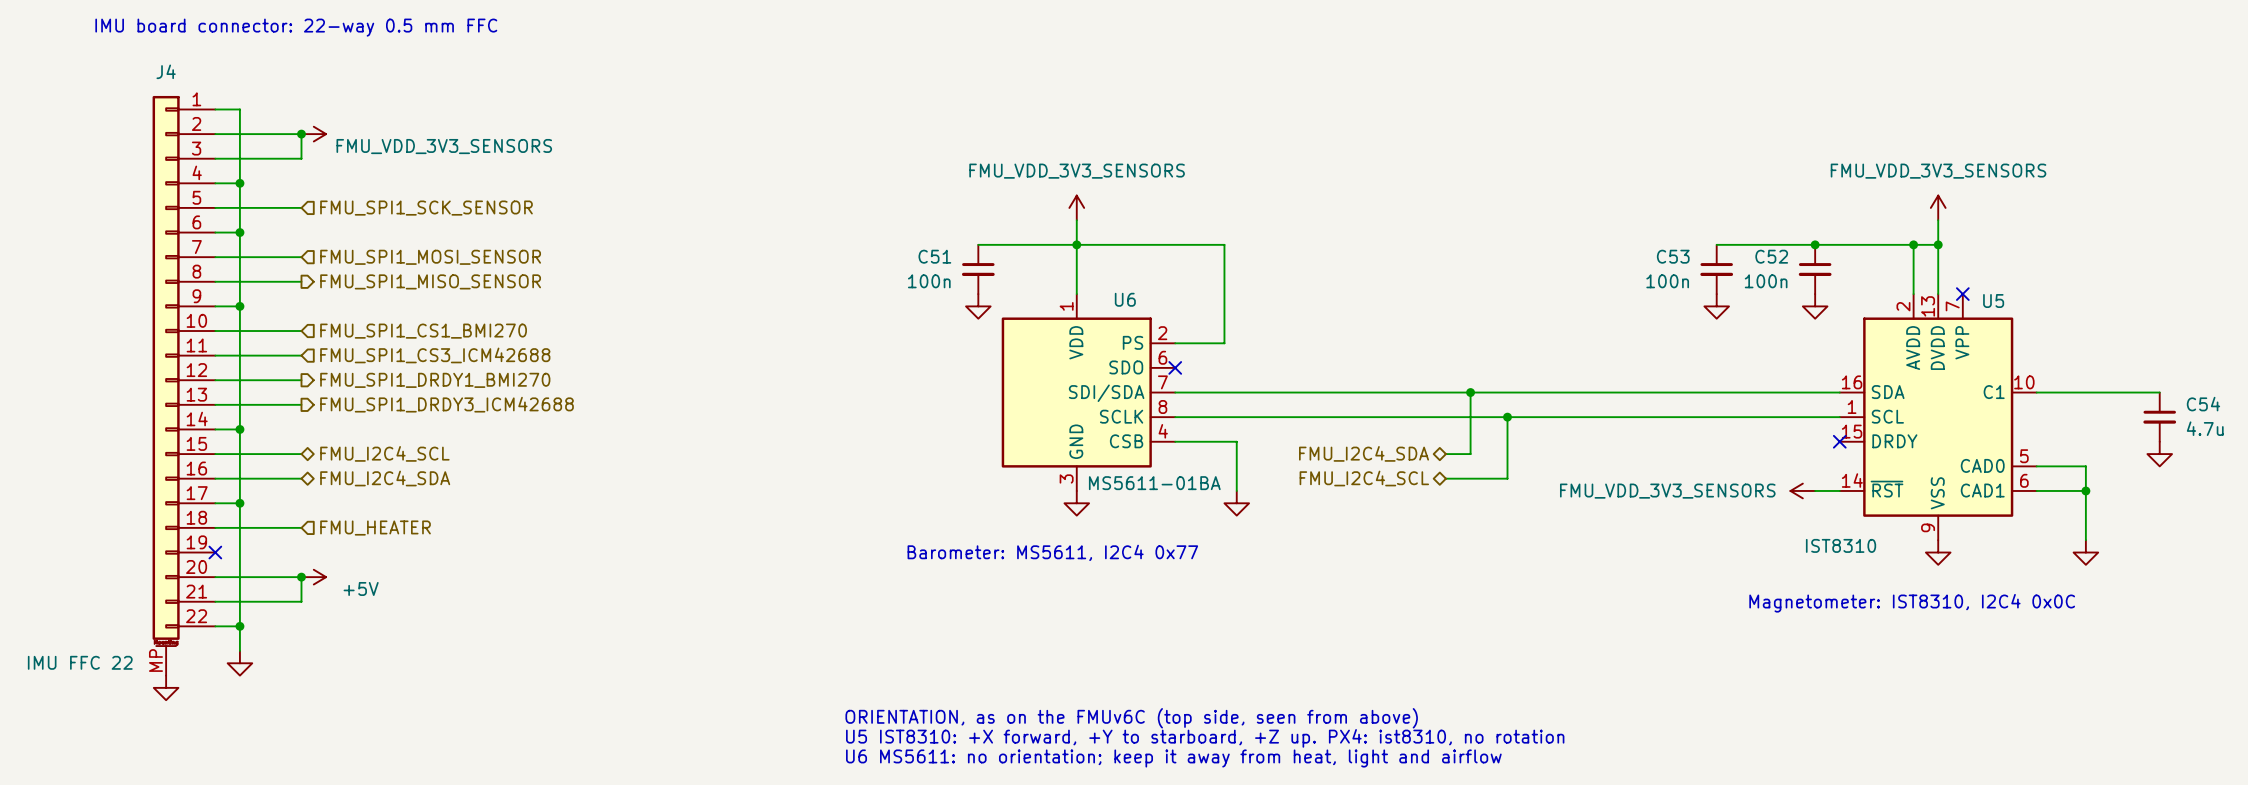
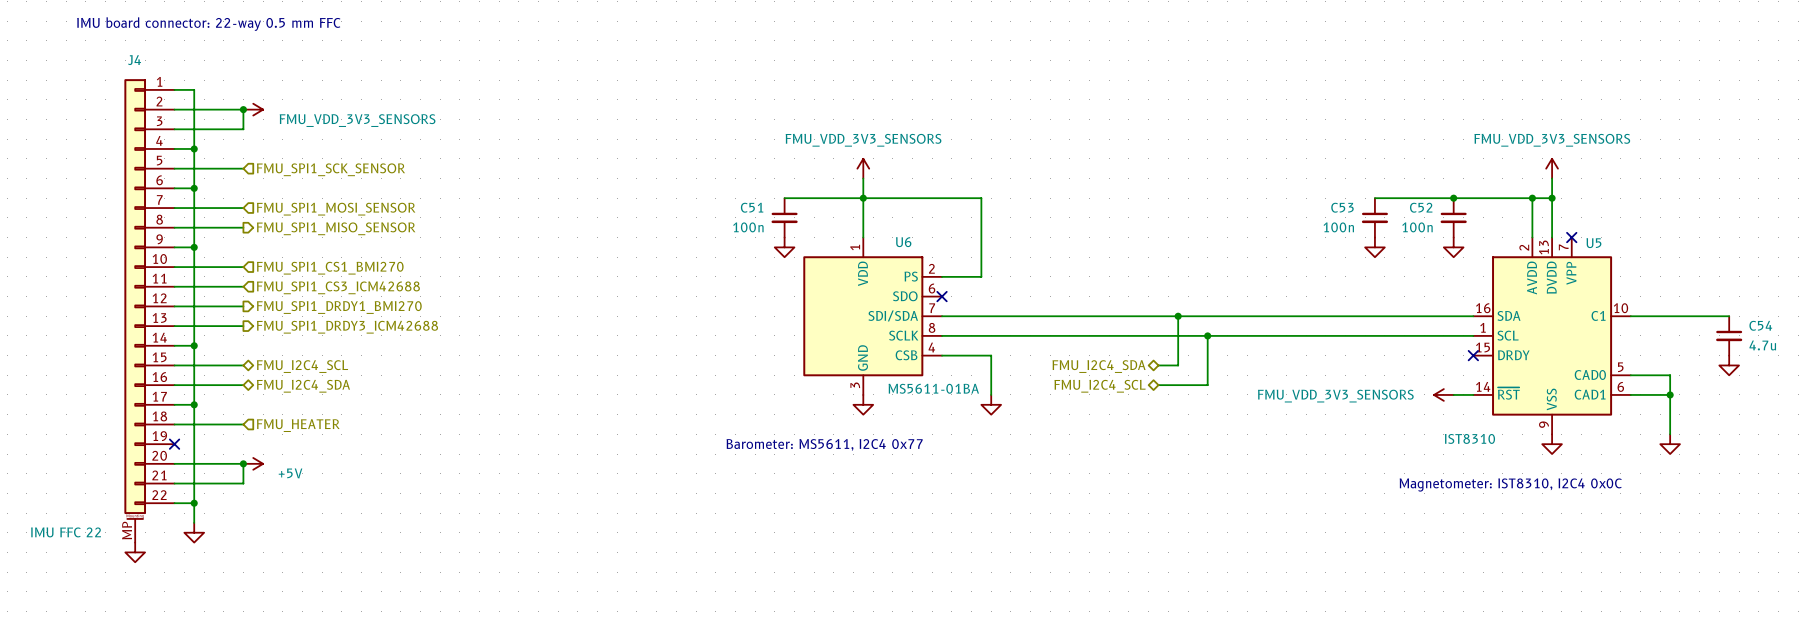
text: ORIENTATION, as on the FMUv6C (top side, seen from above) (1131, 718) -> none
text: U5 IST8310: +X forward, +Y to starboard, +Z up. PX4: ist8310, no rotation (1205, 738) -> none
text: U6 MS5611: no orientation; keep it away from heat, light and airflow (1173, 758) -> none

